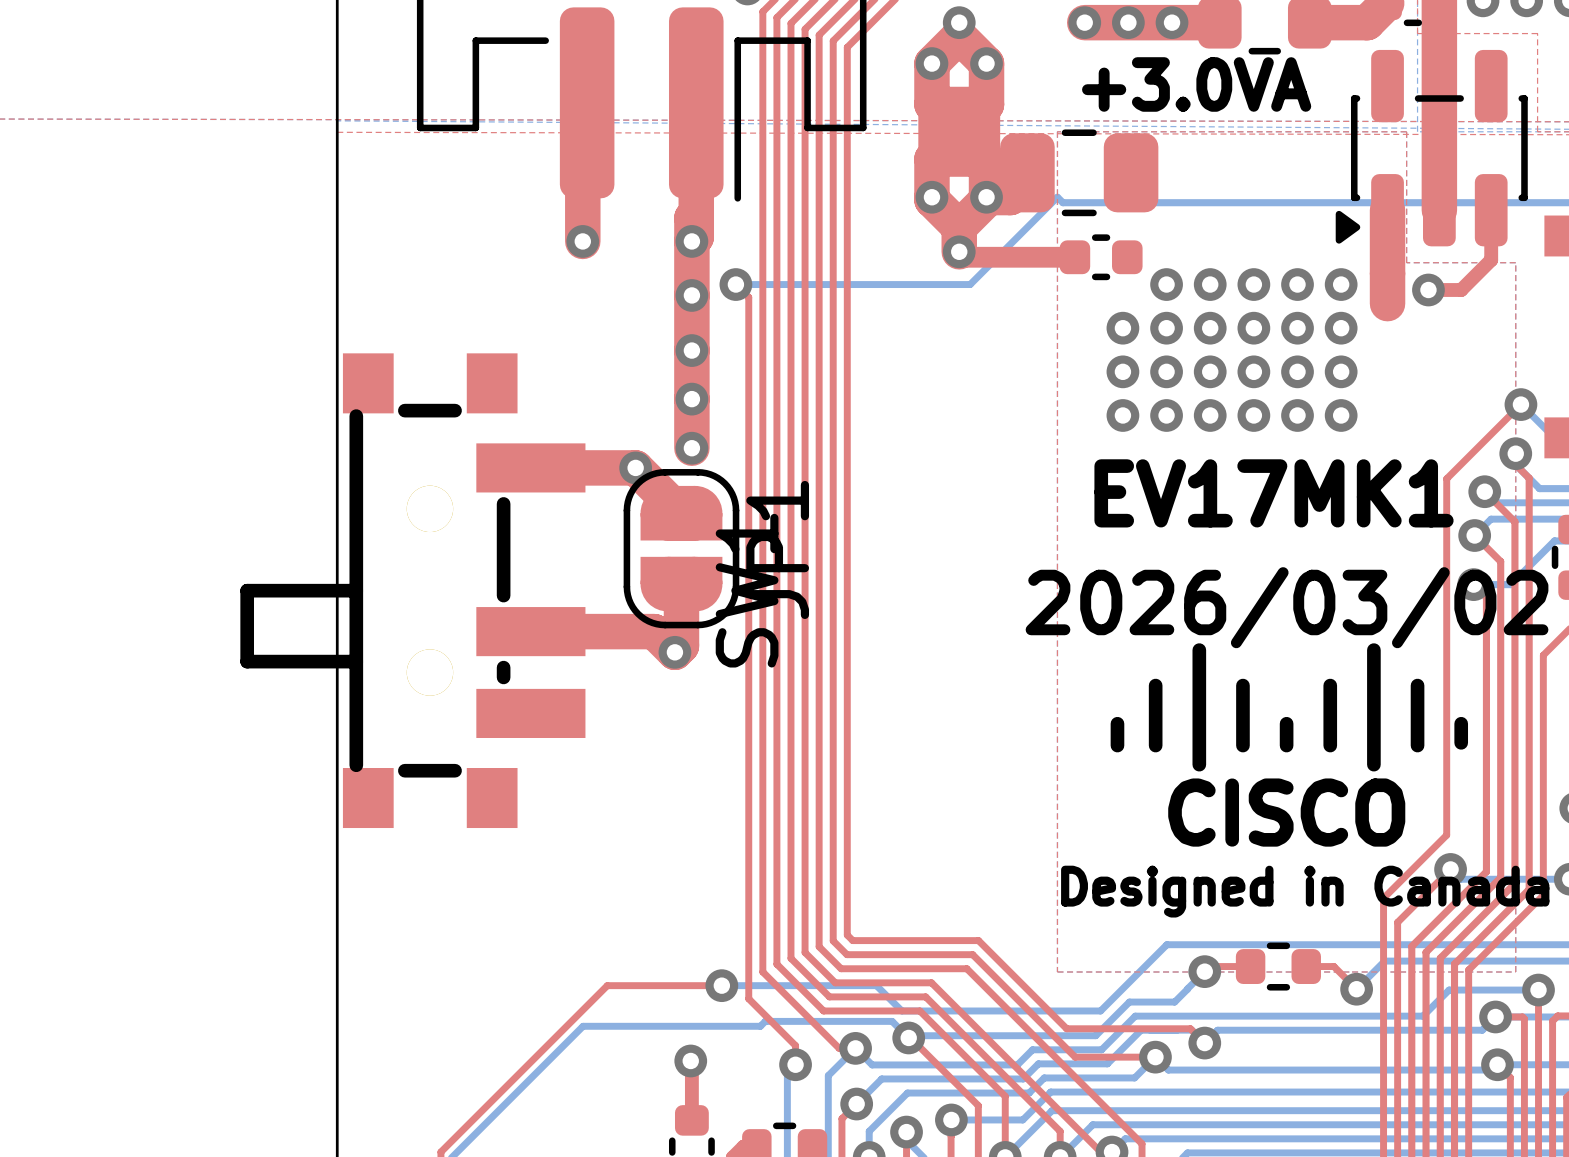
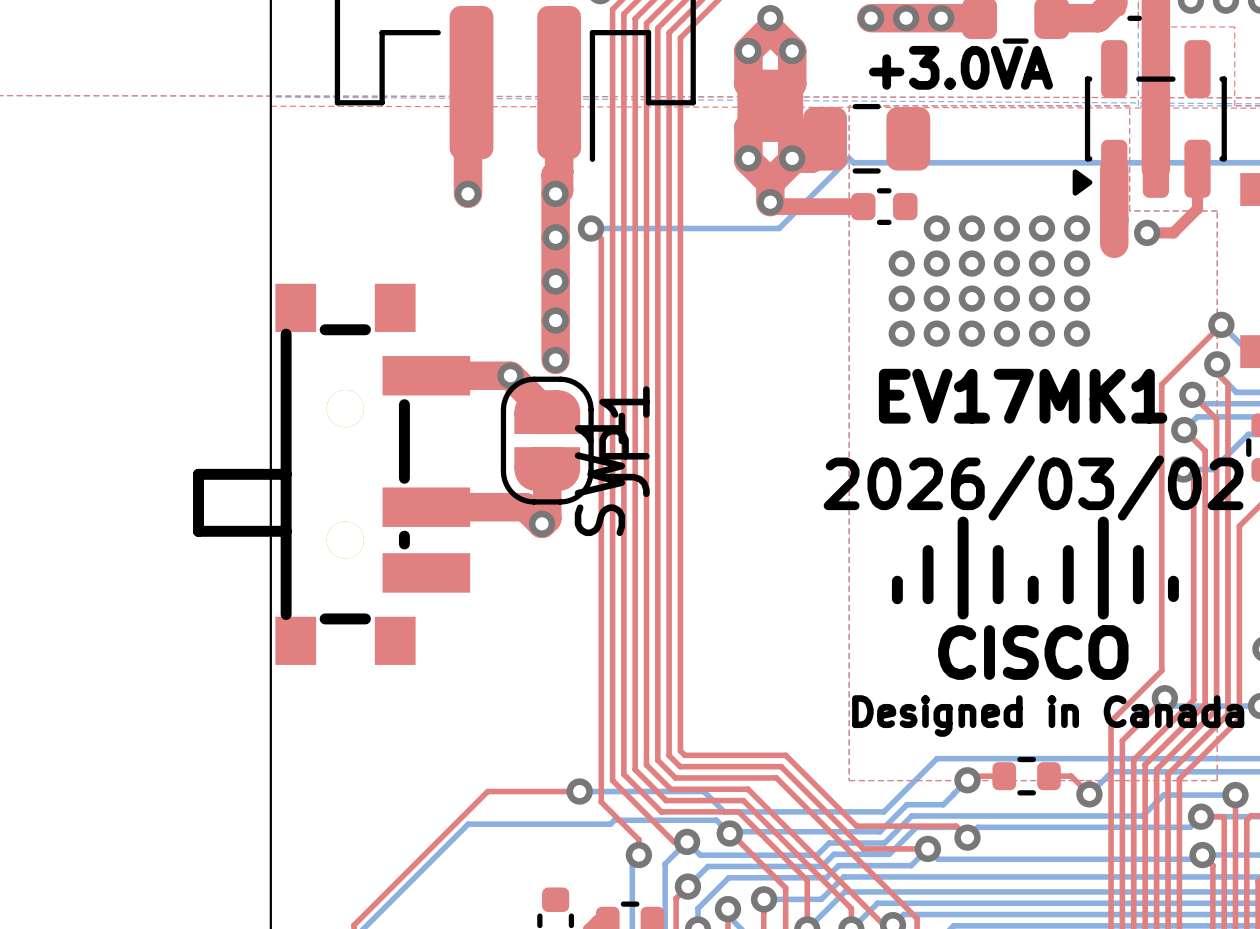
top track: (690, 1060) (691, 1120) -> none
via: (690, 1060) -> none

